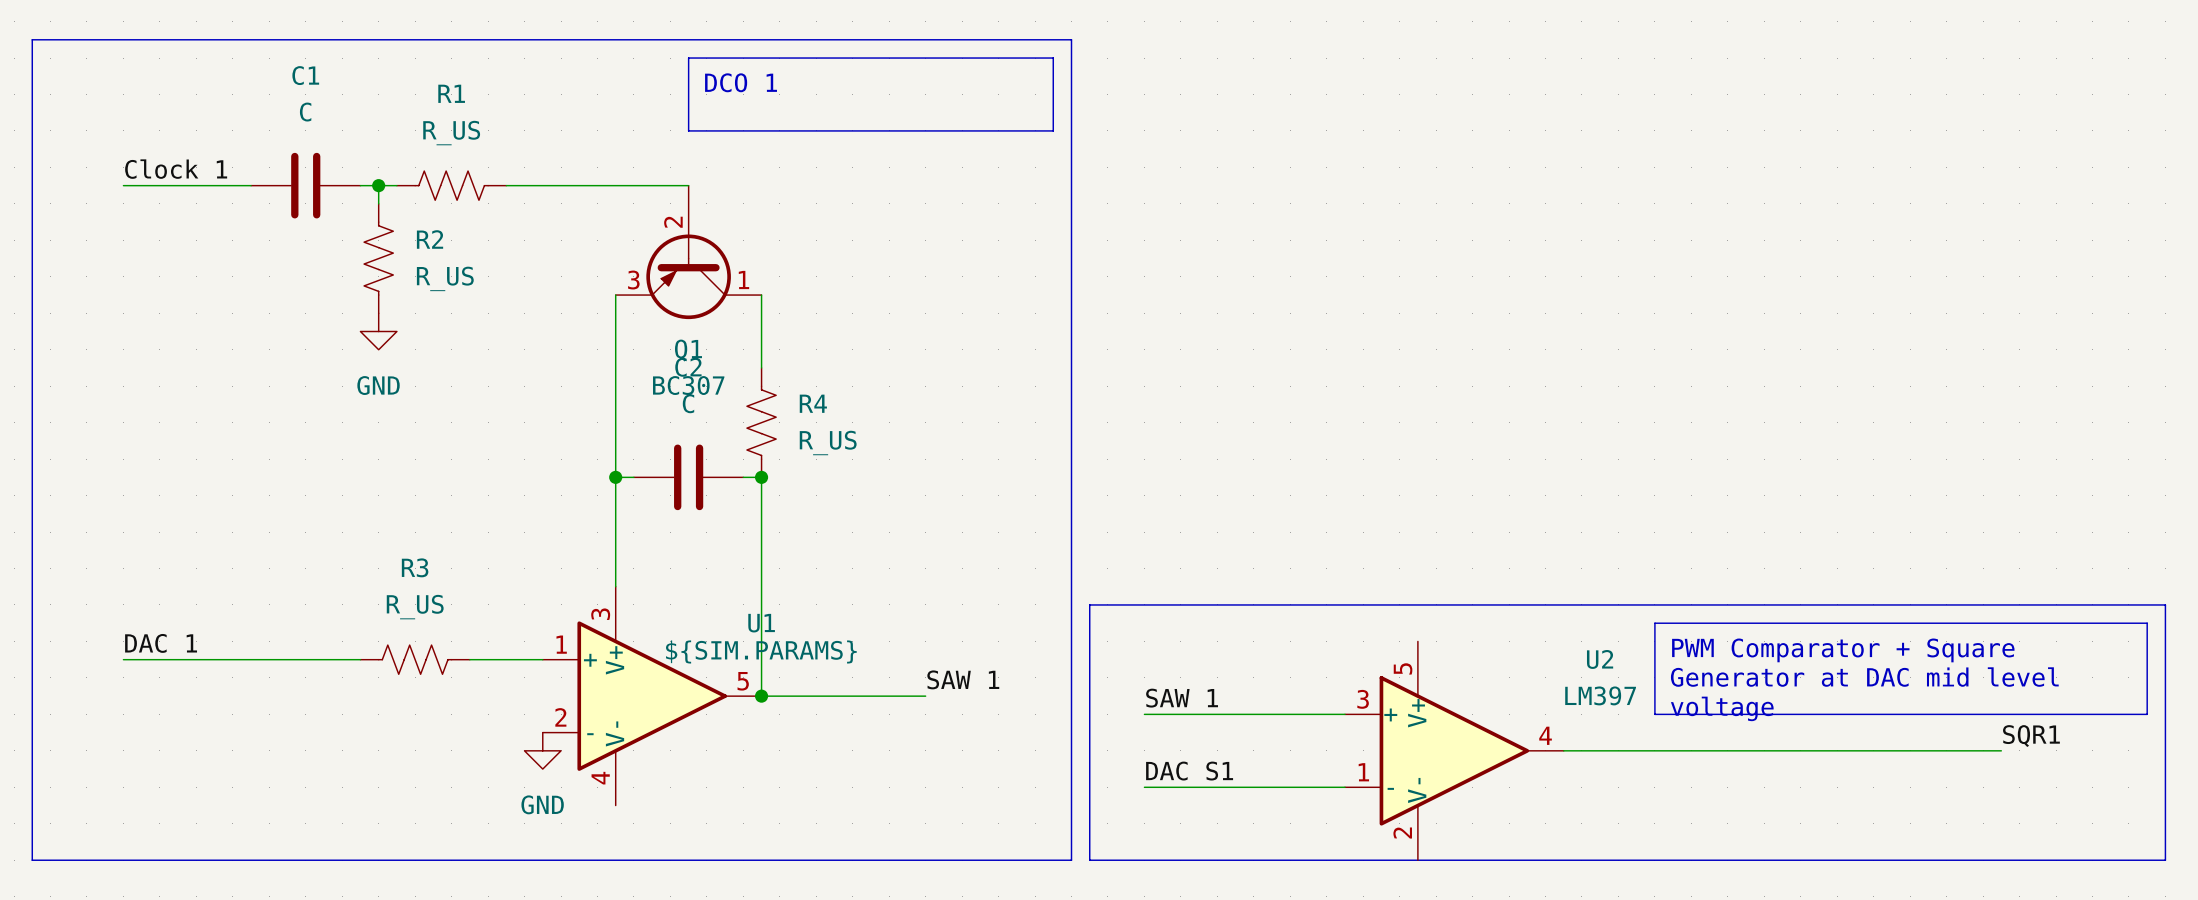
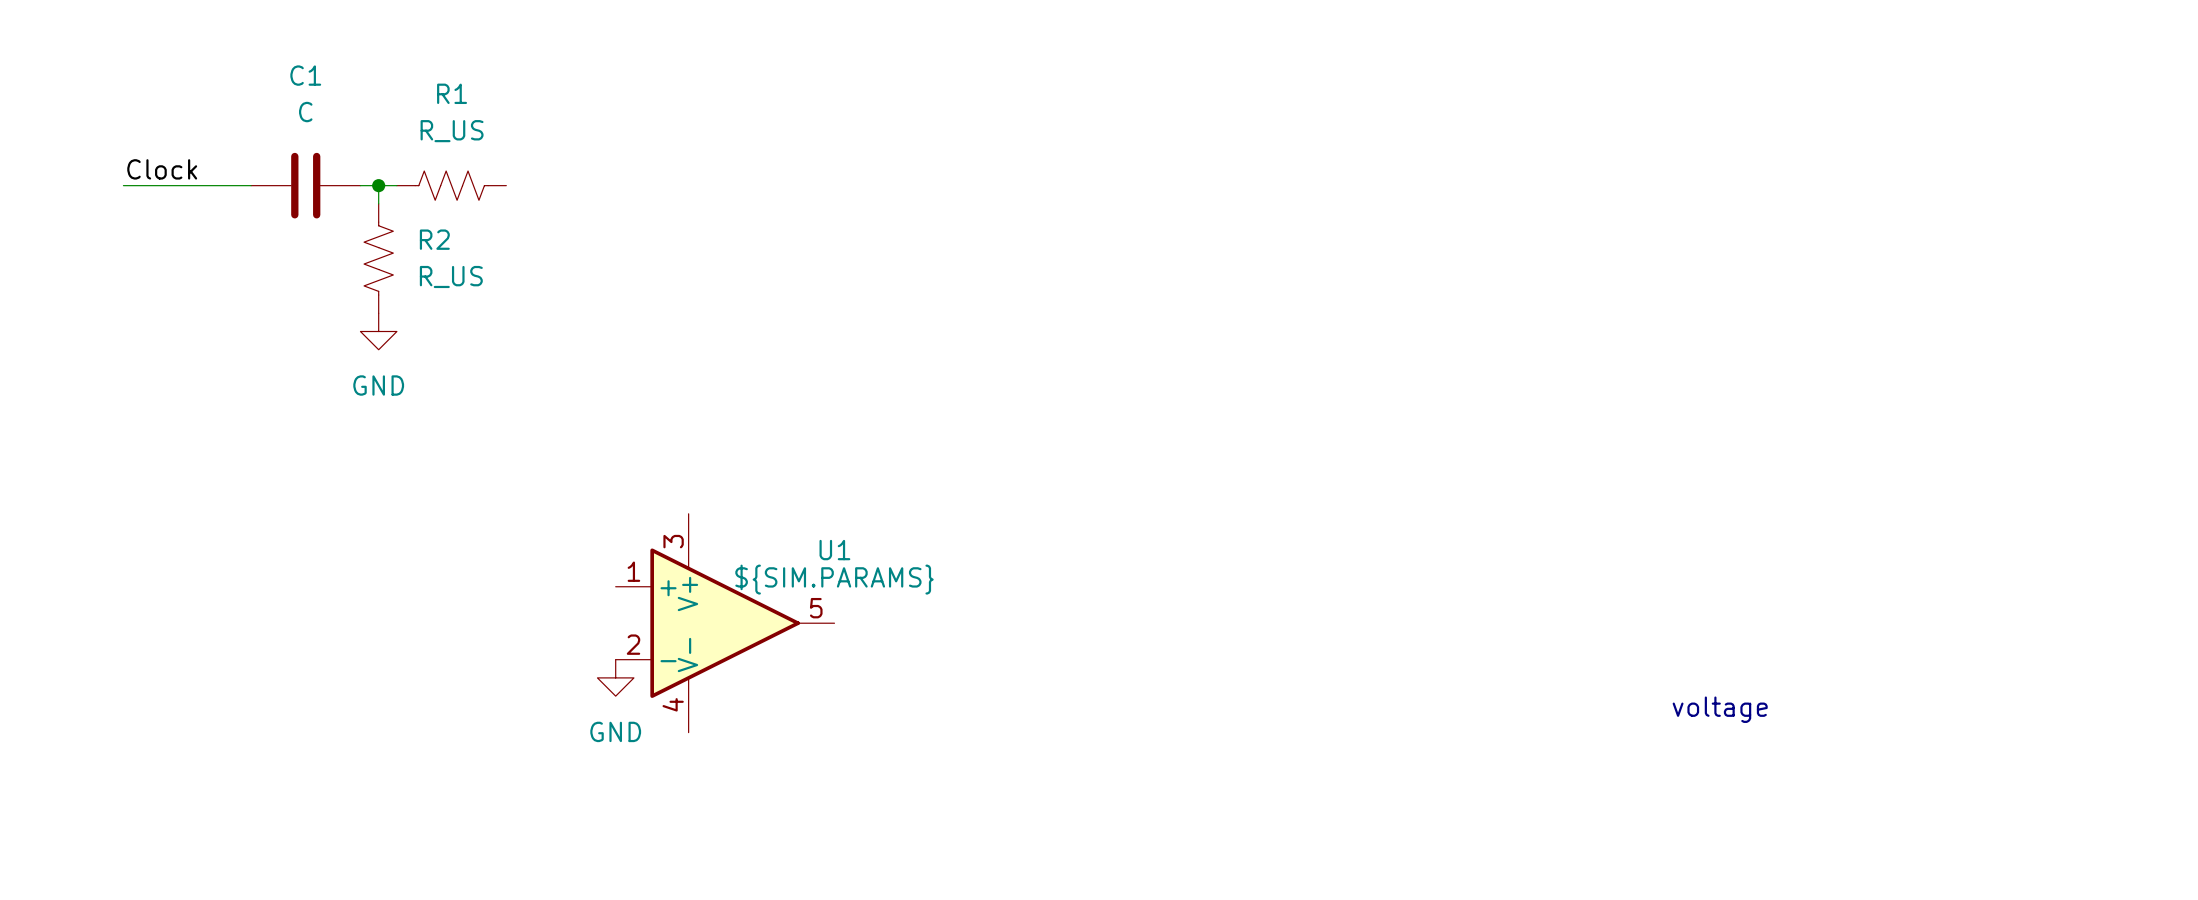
line: (32, 39) (1071, 39) (1071, 860) (32, 860) (32, 39) -> none
line: (688, 58) (1053, 58) (1053, 130) (688, 130) (688, 58) -> none
text: DCO 1 (741, 82) -> none
label: Clock 1 (176, 169) -> Clock (162, 169)
wire: (506, 185) (688, 185) -> none
Q1: BC307 (688, 252) -> none
wire: (615, 295) (615, 586) -> none
wire: (761, 295) (761, 367) -> none
R4: R_US (761, 422) -> none
wire: (615, 477) (633, 477) -> none
junction: (615, 477) -> none
C2: C (688, 477) -> none
wire: (743, 477) (761, 477) (761, 696) (925, 696) -> none
junction: (761, 477) -> none
line: (1089, 604) (2165, 604) (2165, 860) (1089, 860) (1089, 604) -> none
line: (1654, 623) (2147, 623) (2147, 714) (1654, 714) (1654, 623) -> none
label: DAC 1 (161, 643) -> none
text: PWM Comparator + Square (1843, 650) -> none
wire: (123, 659) (360, 659) -> none
R3: R_US (415, 659) -> none
wire: (469, 659) (542, 659) -> none
text: Generator at DAC mid level (1864, 677) -> none
label: SAW 1 (963, 679) -> none
U1 position: (652, 696) -> (725, 623)
junction: (761, 696) -> none
label: SAW 1 (1182, 698) -> none
wire: (1144, 714) (1344, 714) -> none
label: SQR1 (2031, 736) -> none
power symbol position: GND (542, 750) -> GND (615, 677)
U2: LM397 (1454, 750) -> none
wire: (1563, 750) (2001, 750) -> none
label: DAC S1 (1189, 771) -> none
wire: (1144, 787) (1344, 787) -> none

